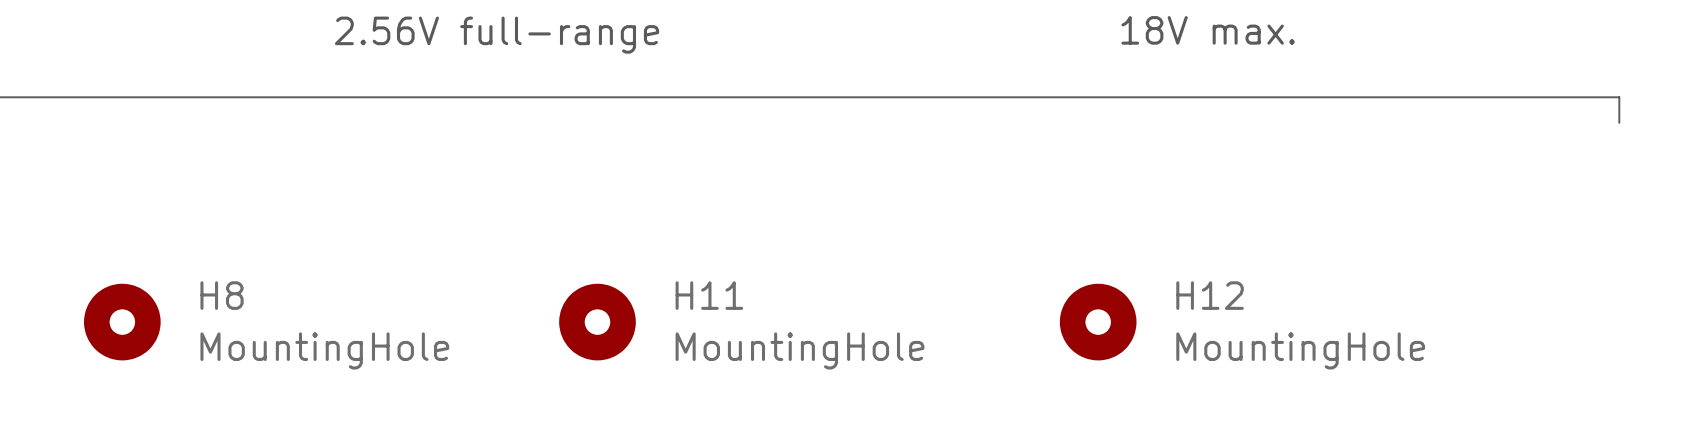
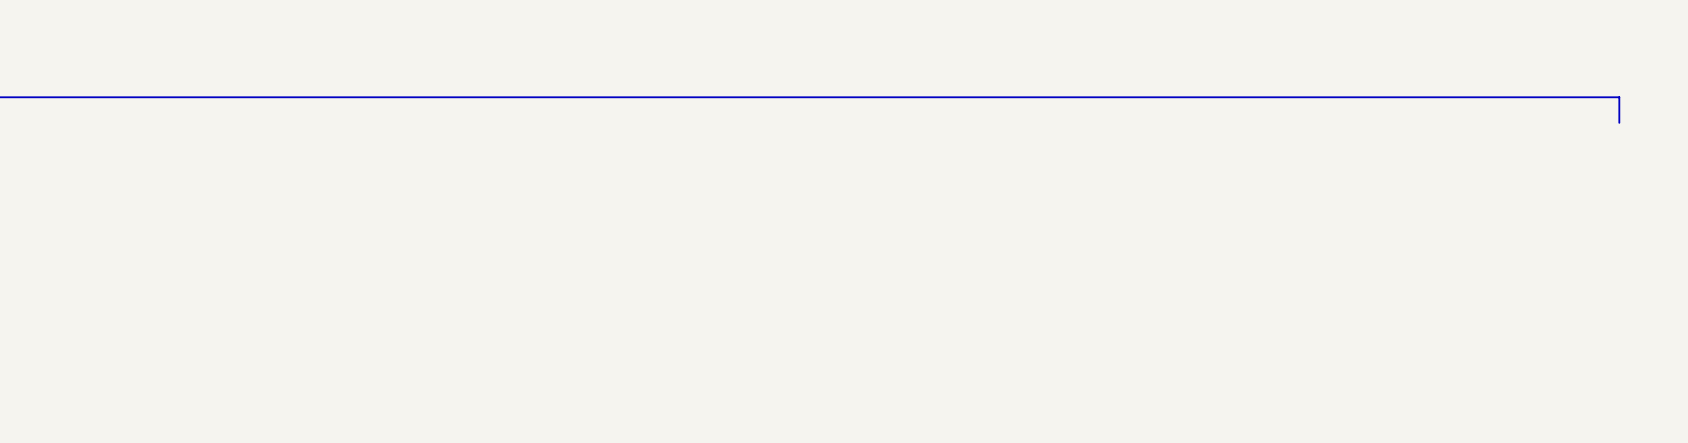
text: 18V max. (1208, 30) -> none
text: 2.56V full-range (497, 35) -> none
H8: MountingHole (122, 322) -> none
H11: MountingHole (597, 322) -> none
H12: MountingHole (1098, 322) -> none

